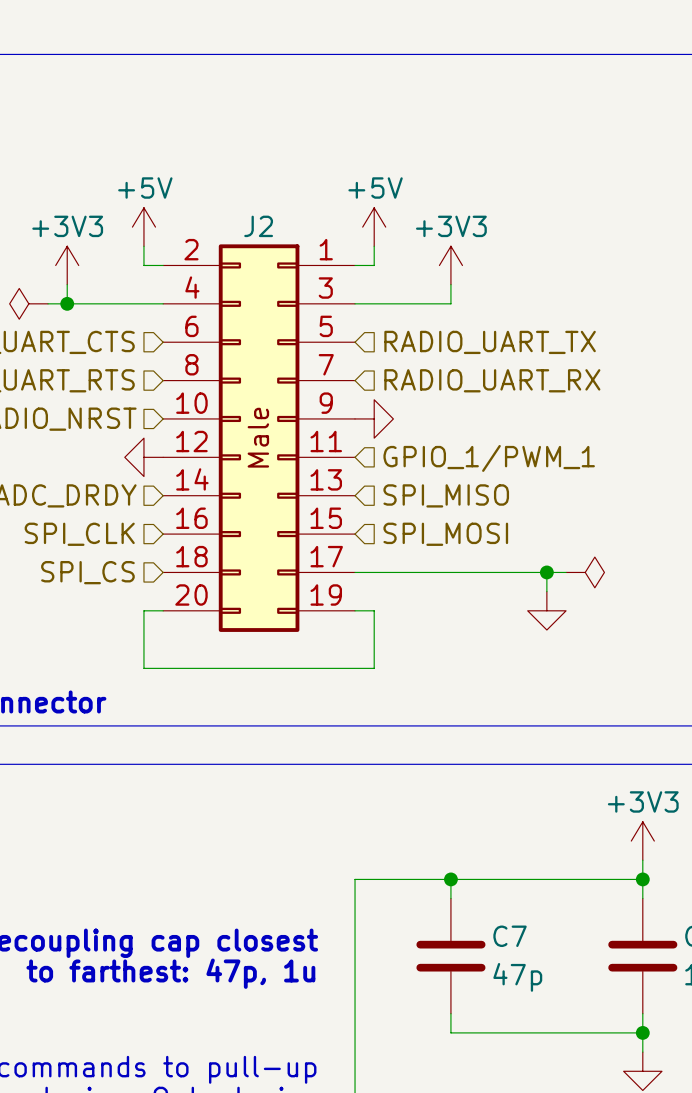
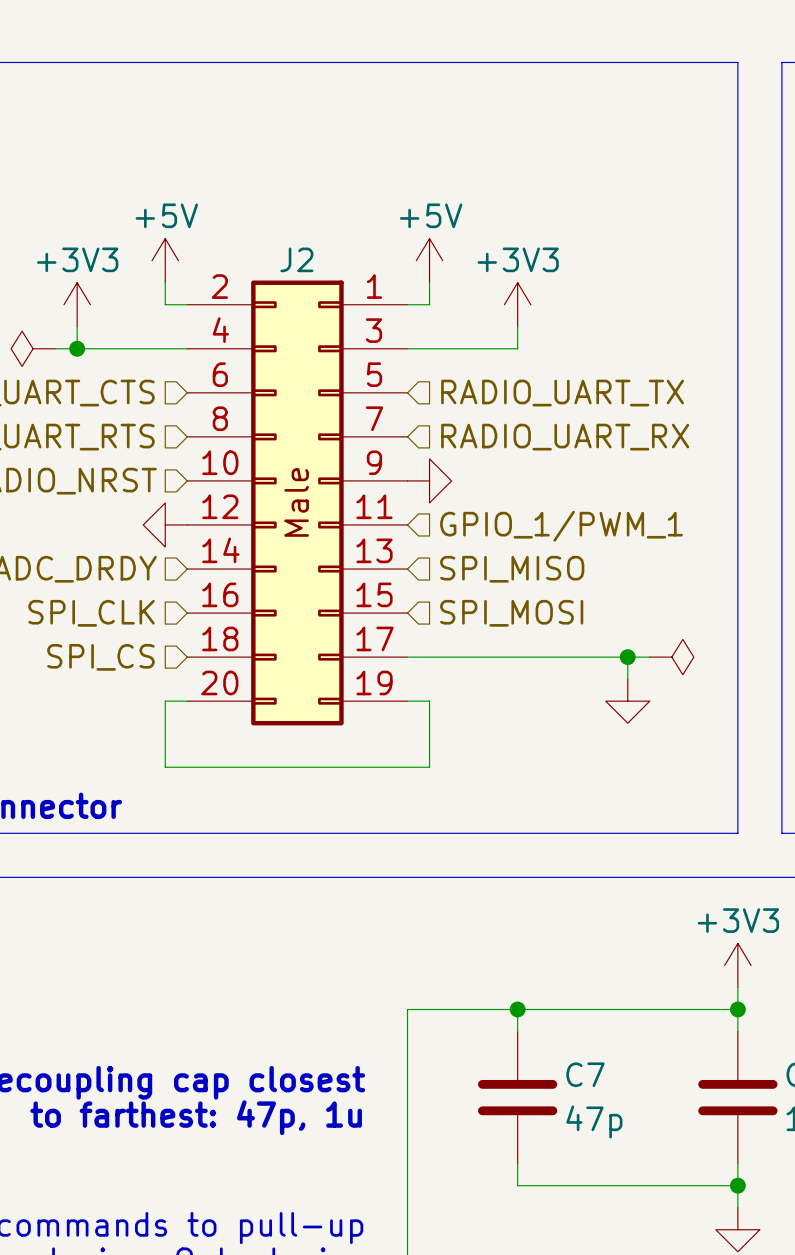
line: (642, 54) (681, 54) -> (737, 62) (737, 833)
line: (642, 725) (681, 725) -> (781, 62) (781, 833)

